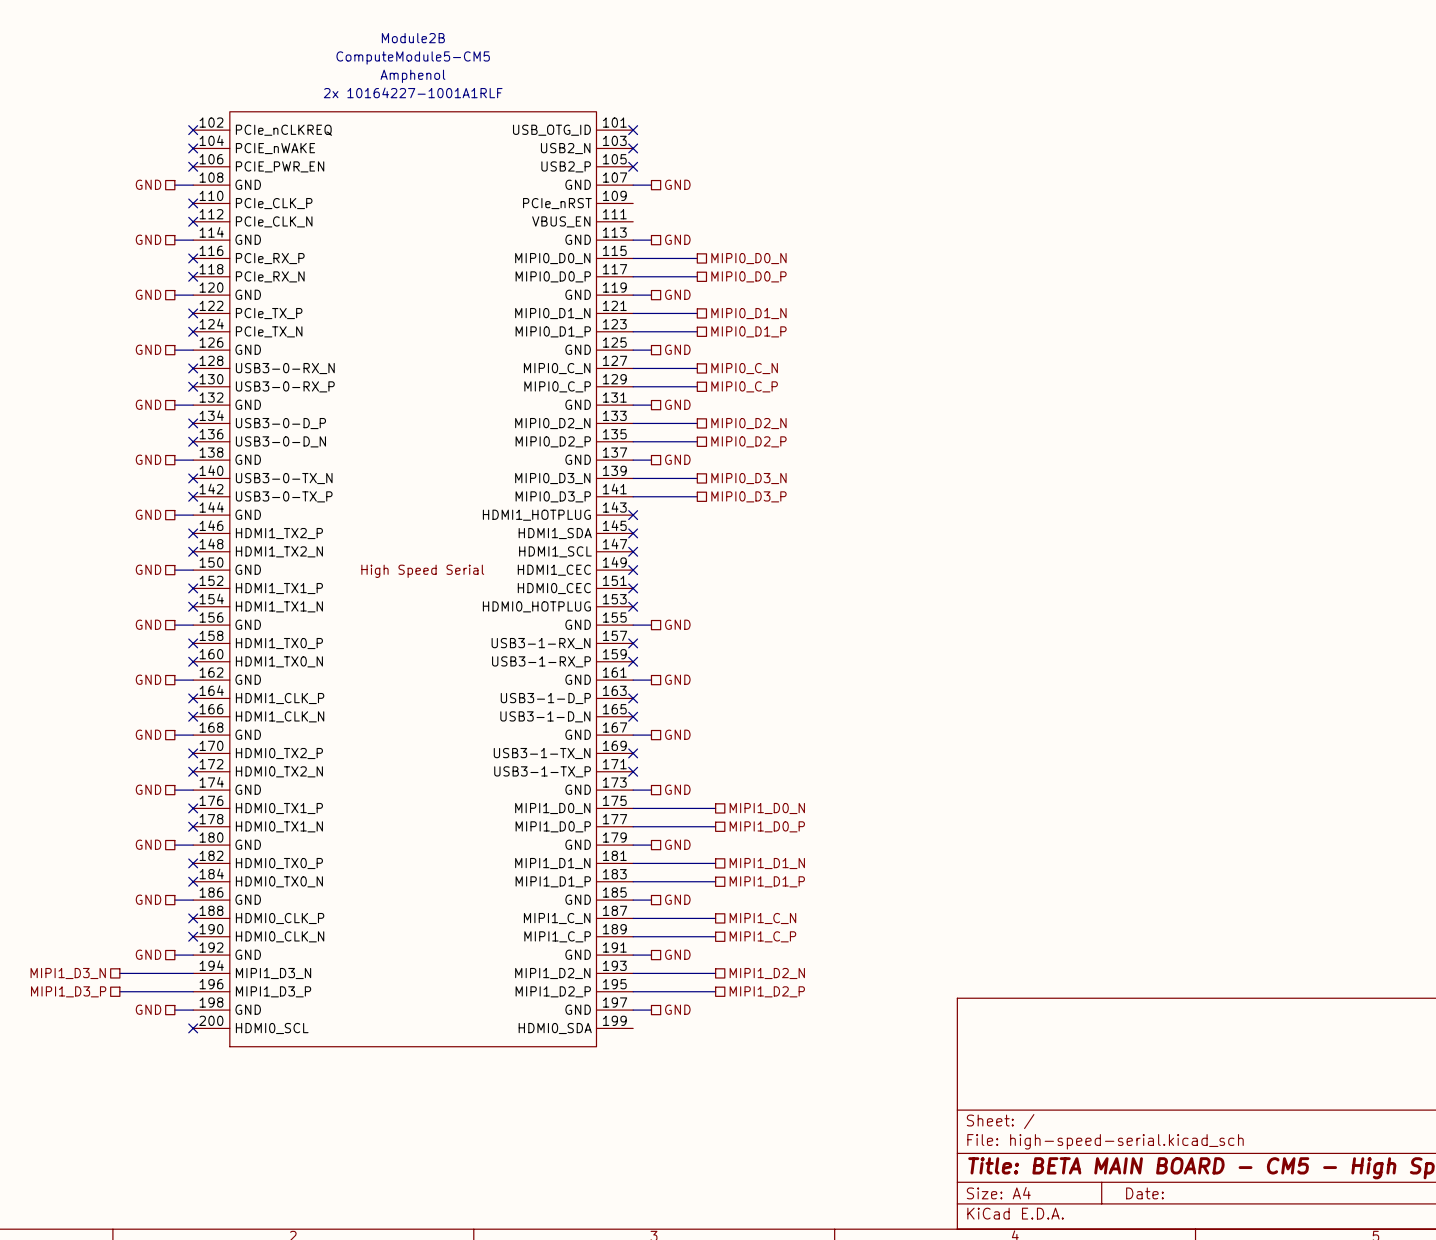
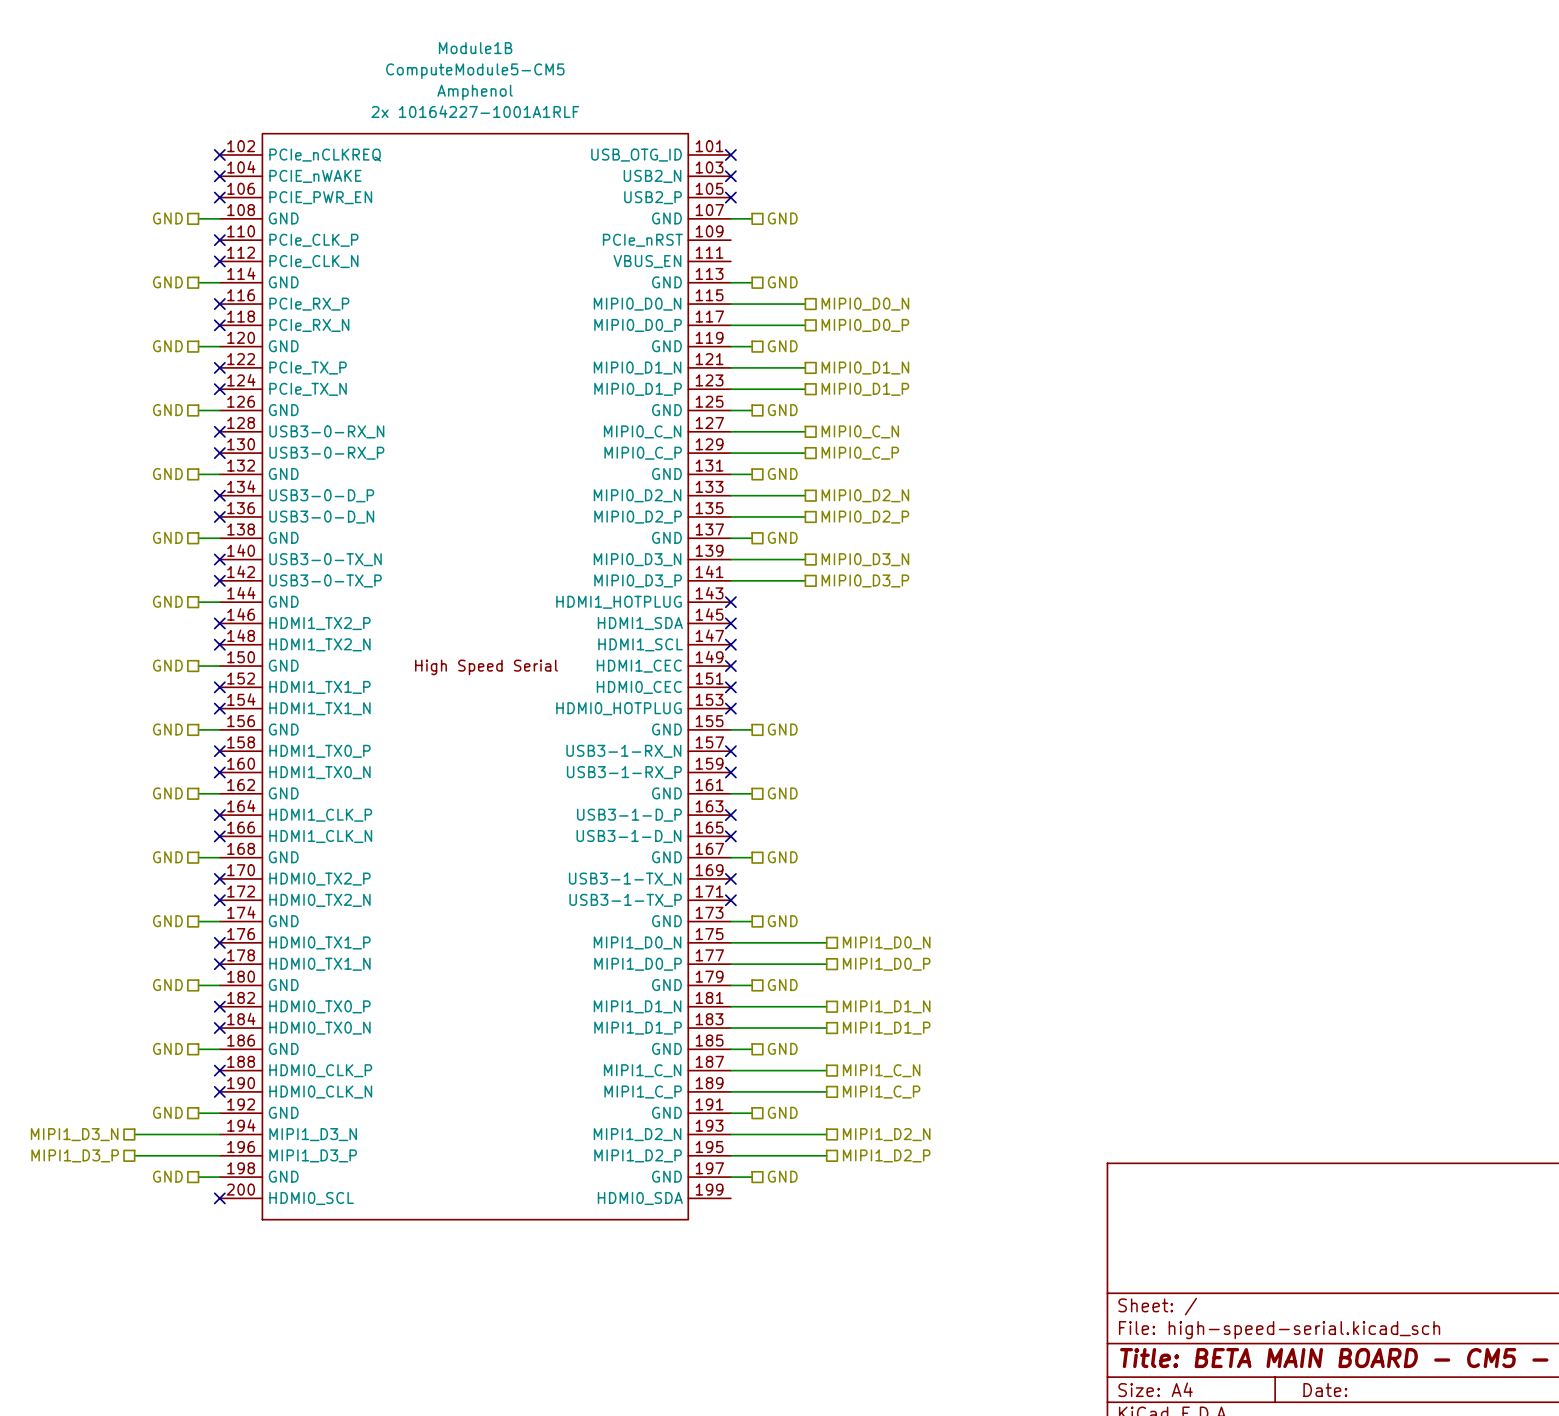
Module2B name: Module2B (413, 38) -> Module1B (475, 48)

